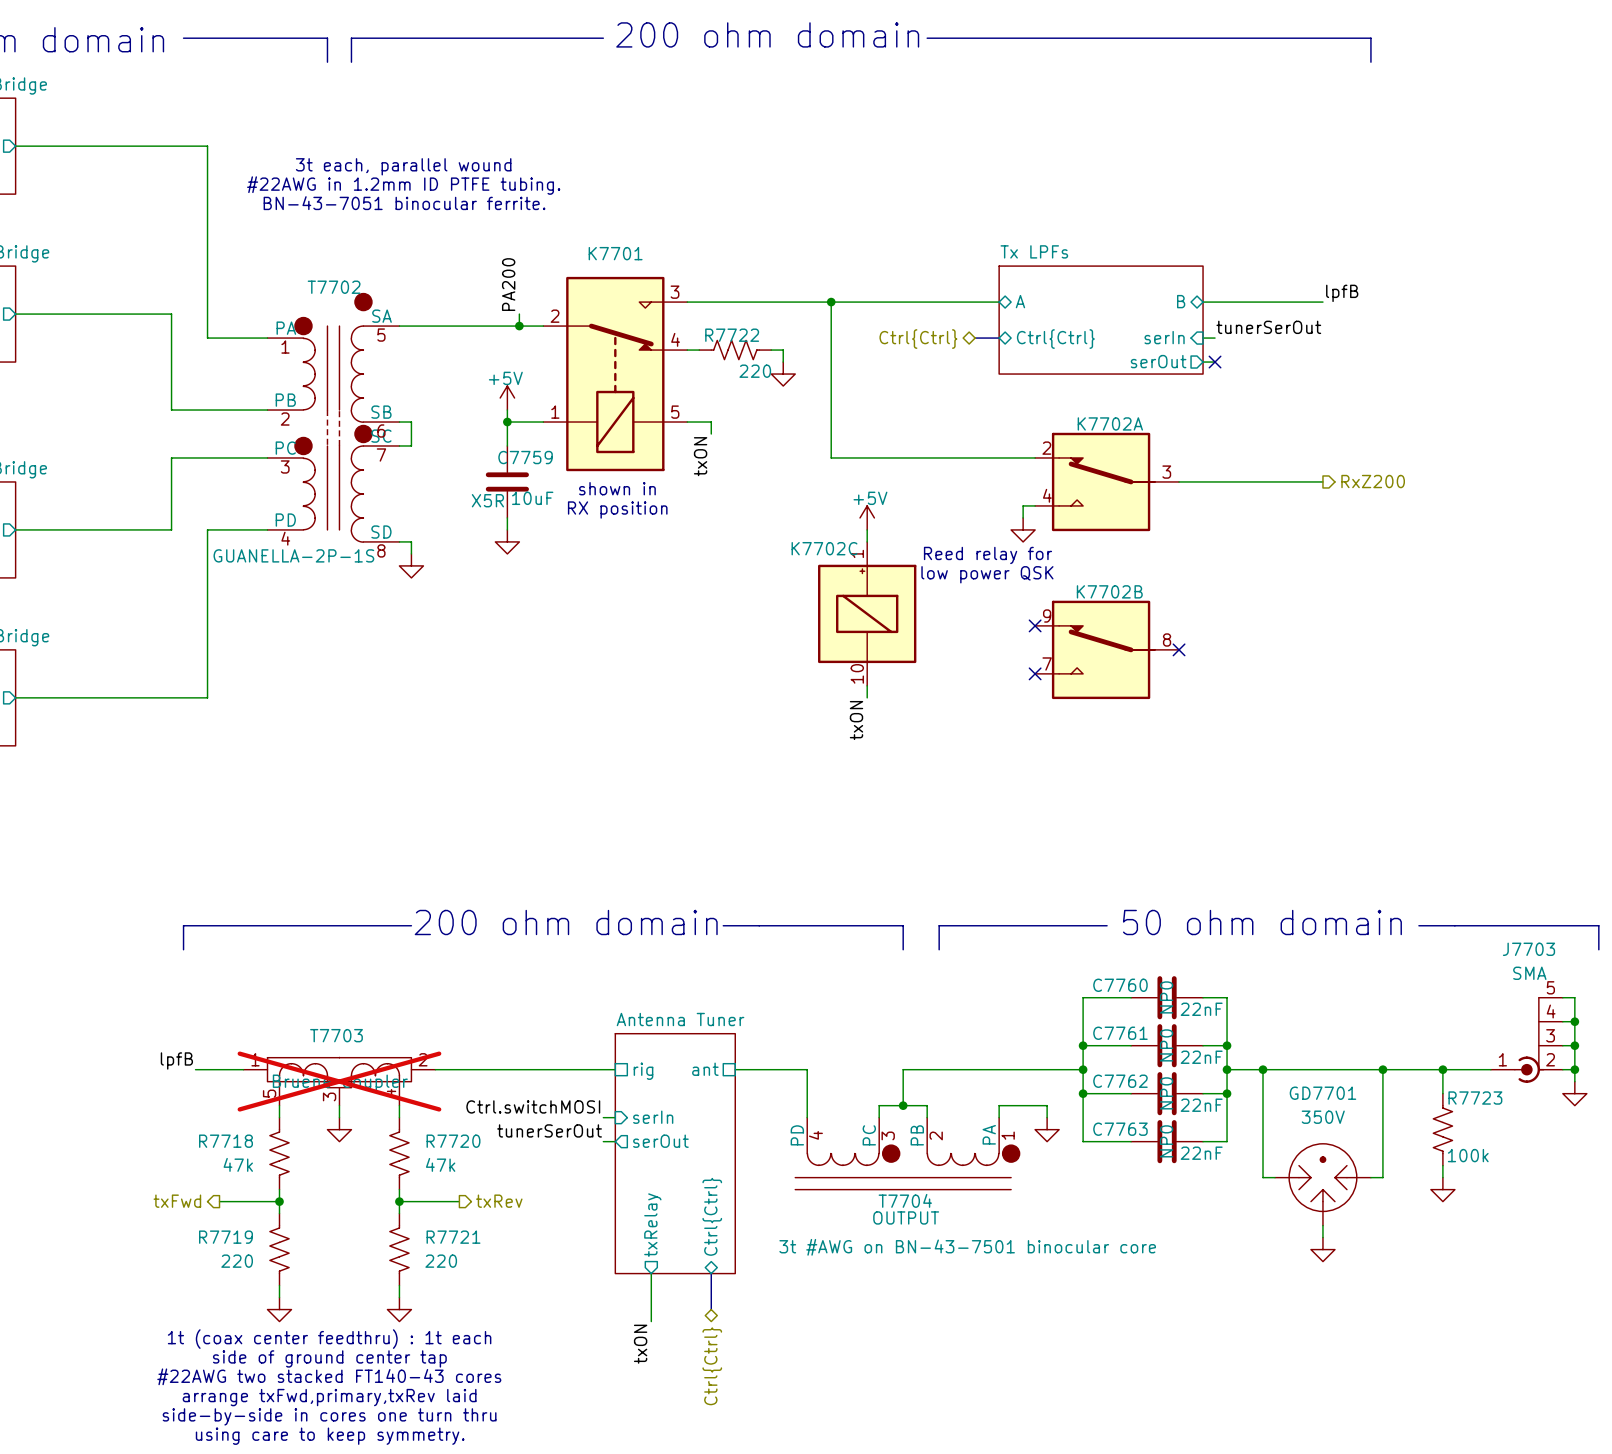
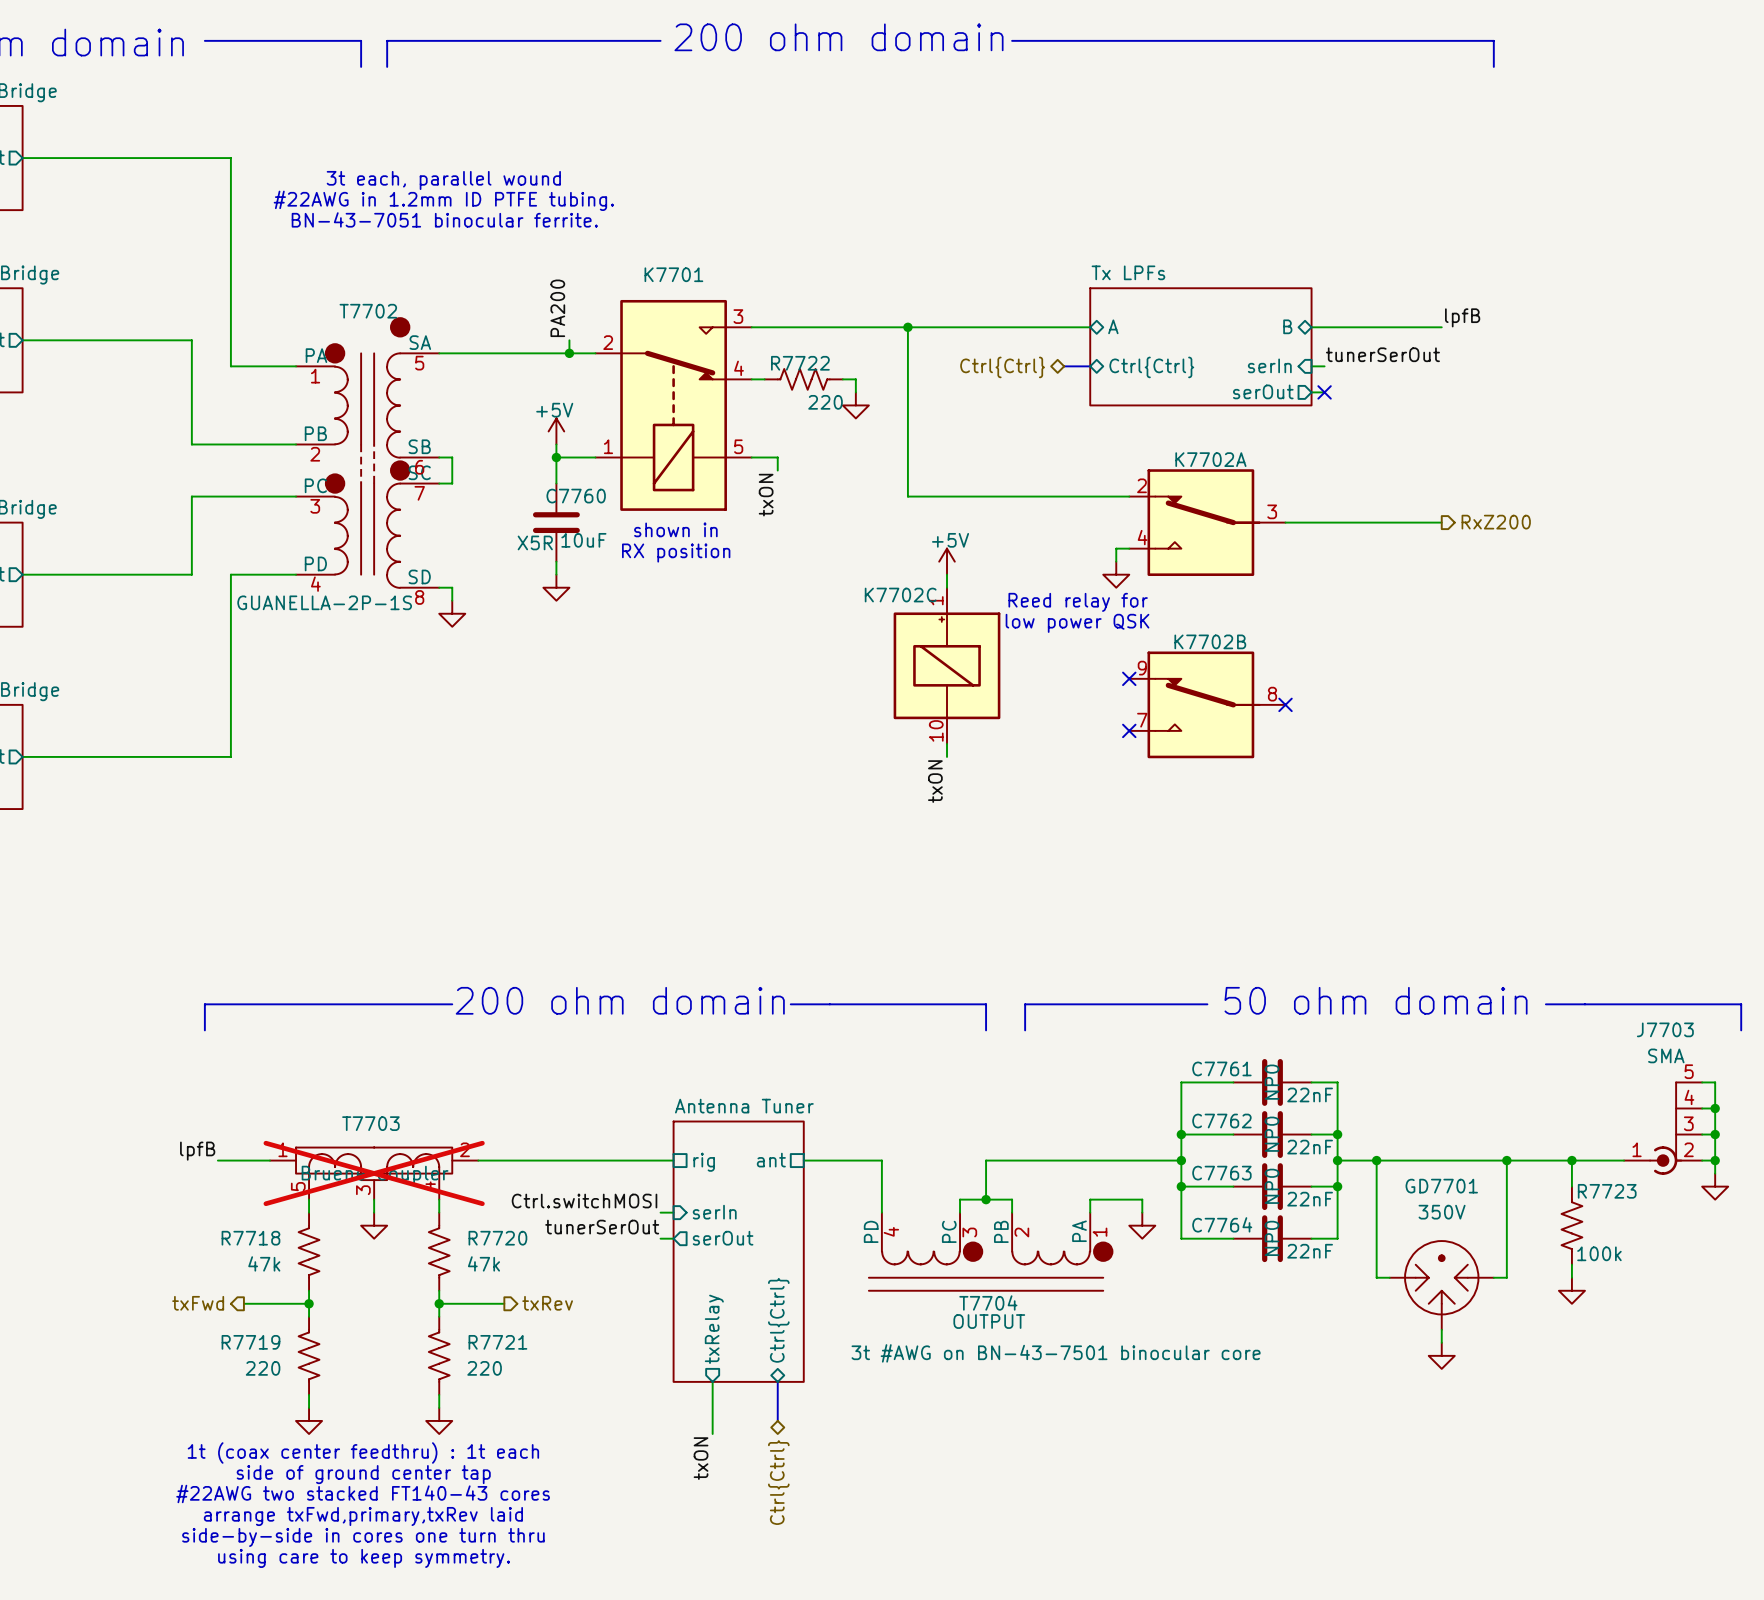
C7759 name: C7759 (525, 457) -> C7760 (576, 496)
C7760 name: C7760 (1120, 985) -> C7761 (1221, 1068)
C7761 name: C7761 (1120, 1033) -> C7762 (1221, 1121)
C7762 name: C7762 (1120, 1081) -> C7763 (1221, 1173)
C7763 name: C7763 (1120, 1129) -> C7764 (1222, 1224)

